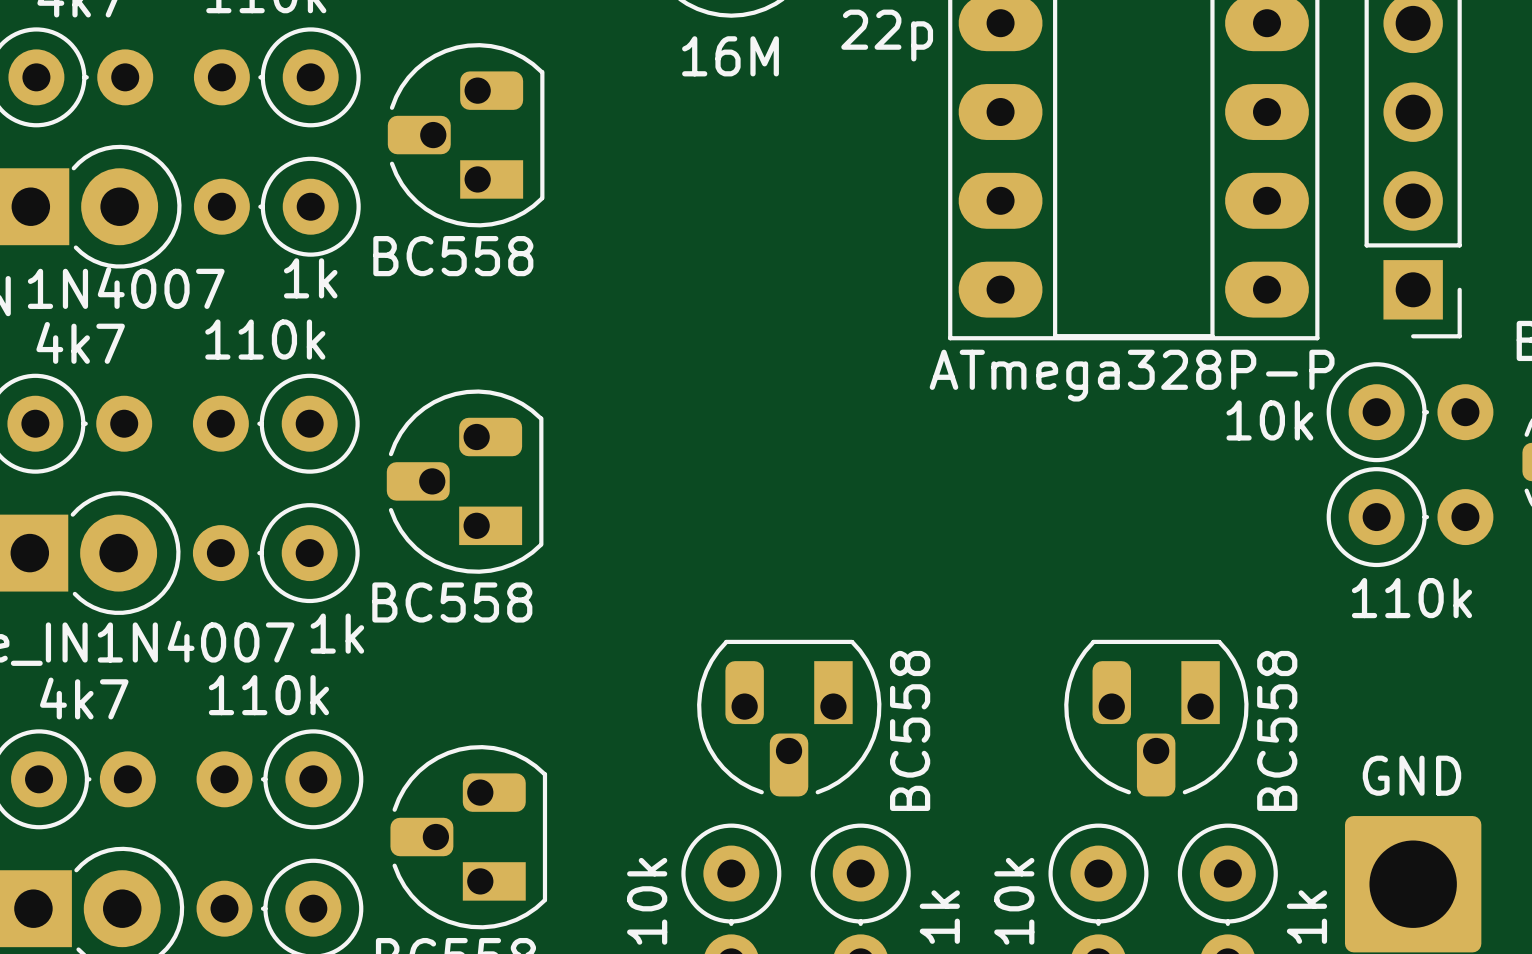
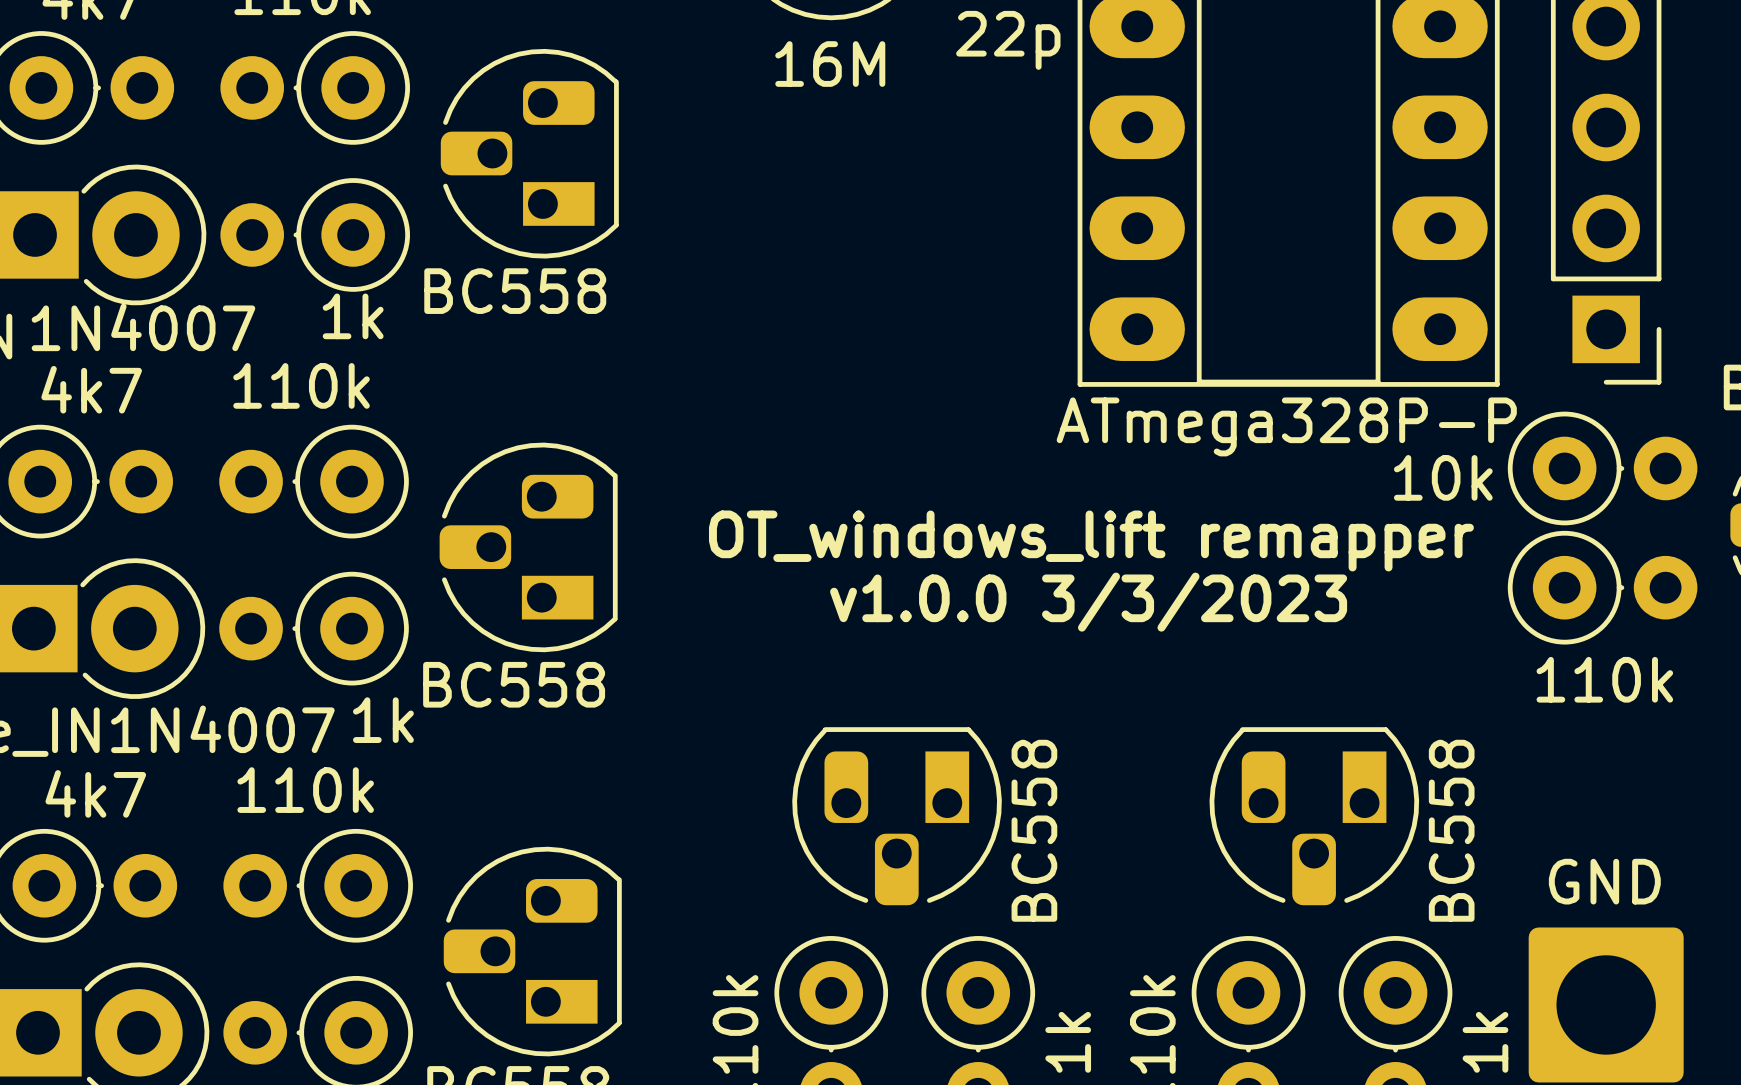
text: none -> OT_windows_lift remapper (1091, 540)
text: none -> v1.0.0 3/3/2023 (1088, 602)

